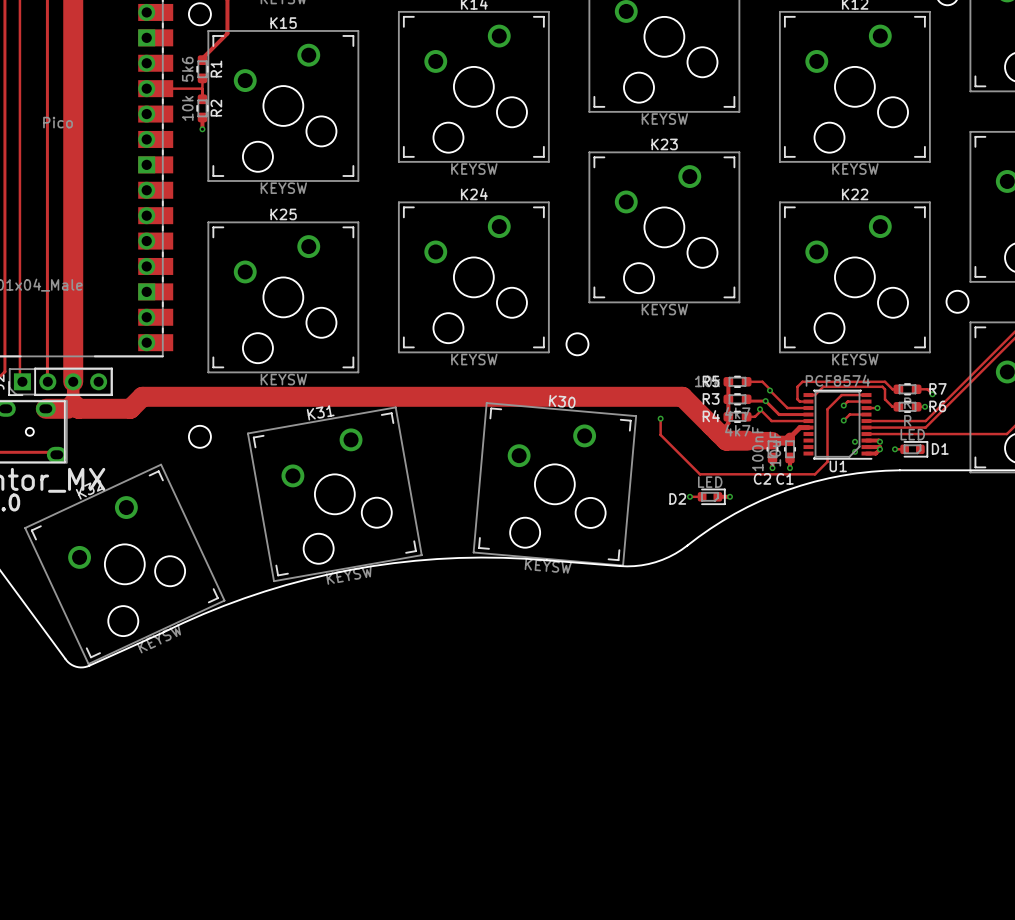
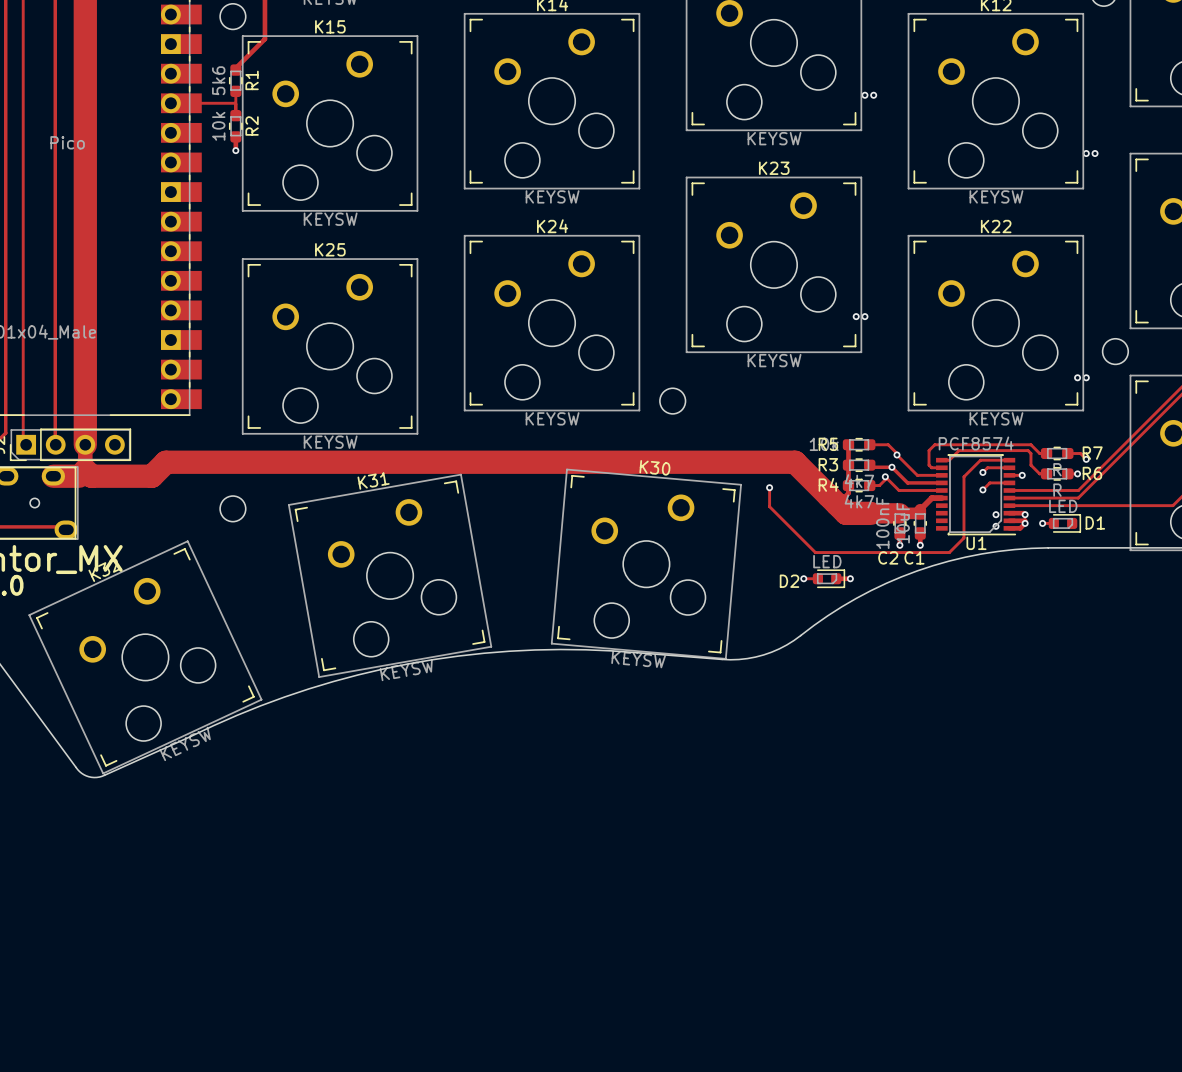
via: none -> (864, 95)
via: none -> (873, 95)
via: none -> (1086, 153)
via: none -> (1095, 153)
via: none -> (856, 316)
via: none -> (864, 316)
via: none -> (1077, 377)
via: none -> (1086, 377)

